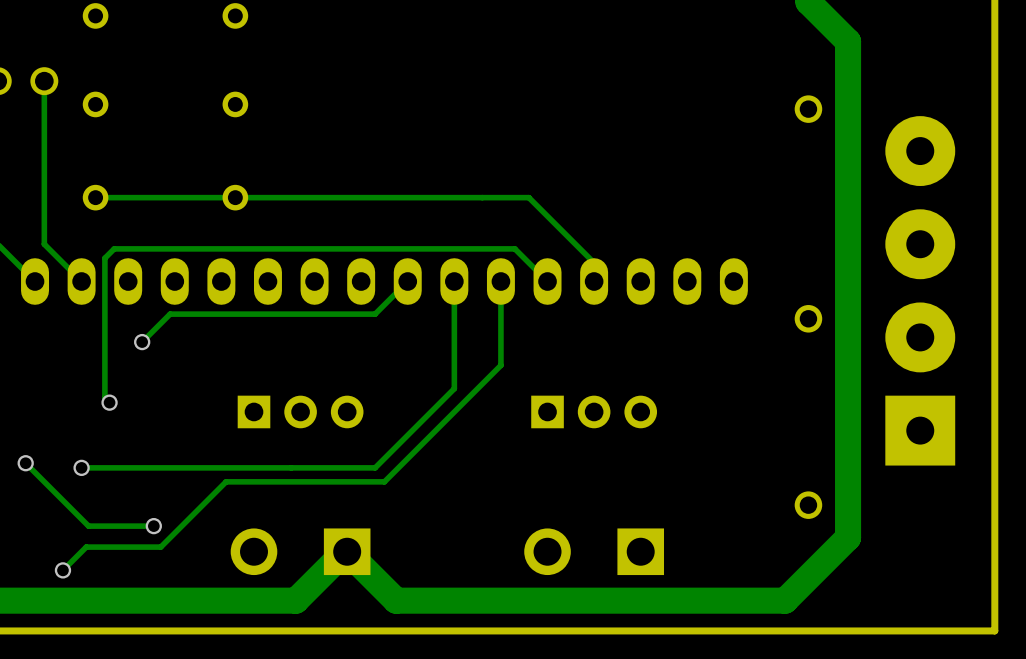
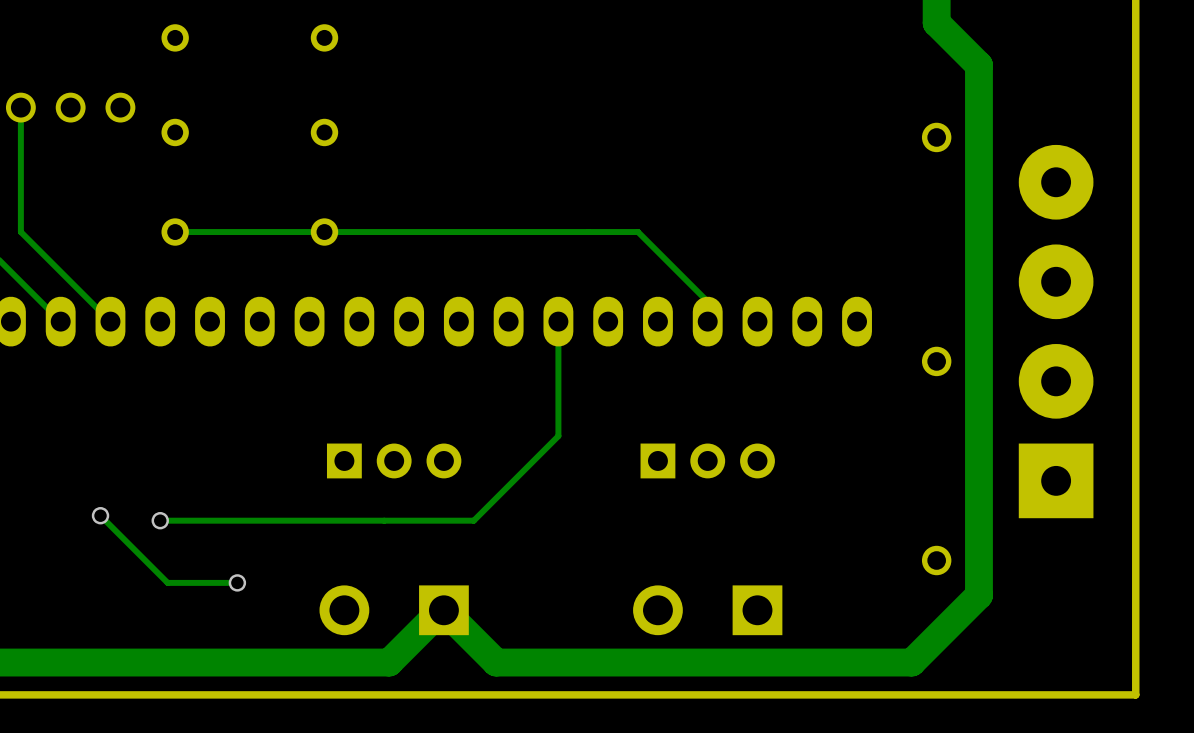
track: (44, 81) (44, 244) (81, 281) -> none
track: (407, 281) (375, 314) (170, 314) (142, 342) -> none
track: (500, 281) (500, 365) (384, 481) (226, 481) (160, 547) (86, 547) (62, 570) -> none
track: (547, 281) (514, 248) (114, 248) (104, 258) (104, 397) (109, 402) -> none
via: (142, 342) -> none
via: (109, 402) -> none
via: (62, 570) -> none

